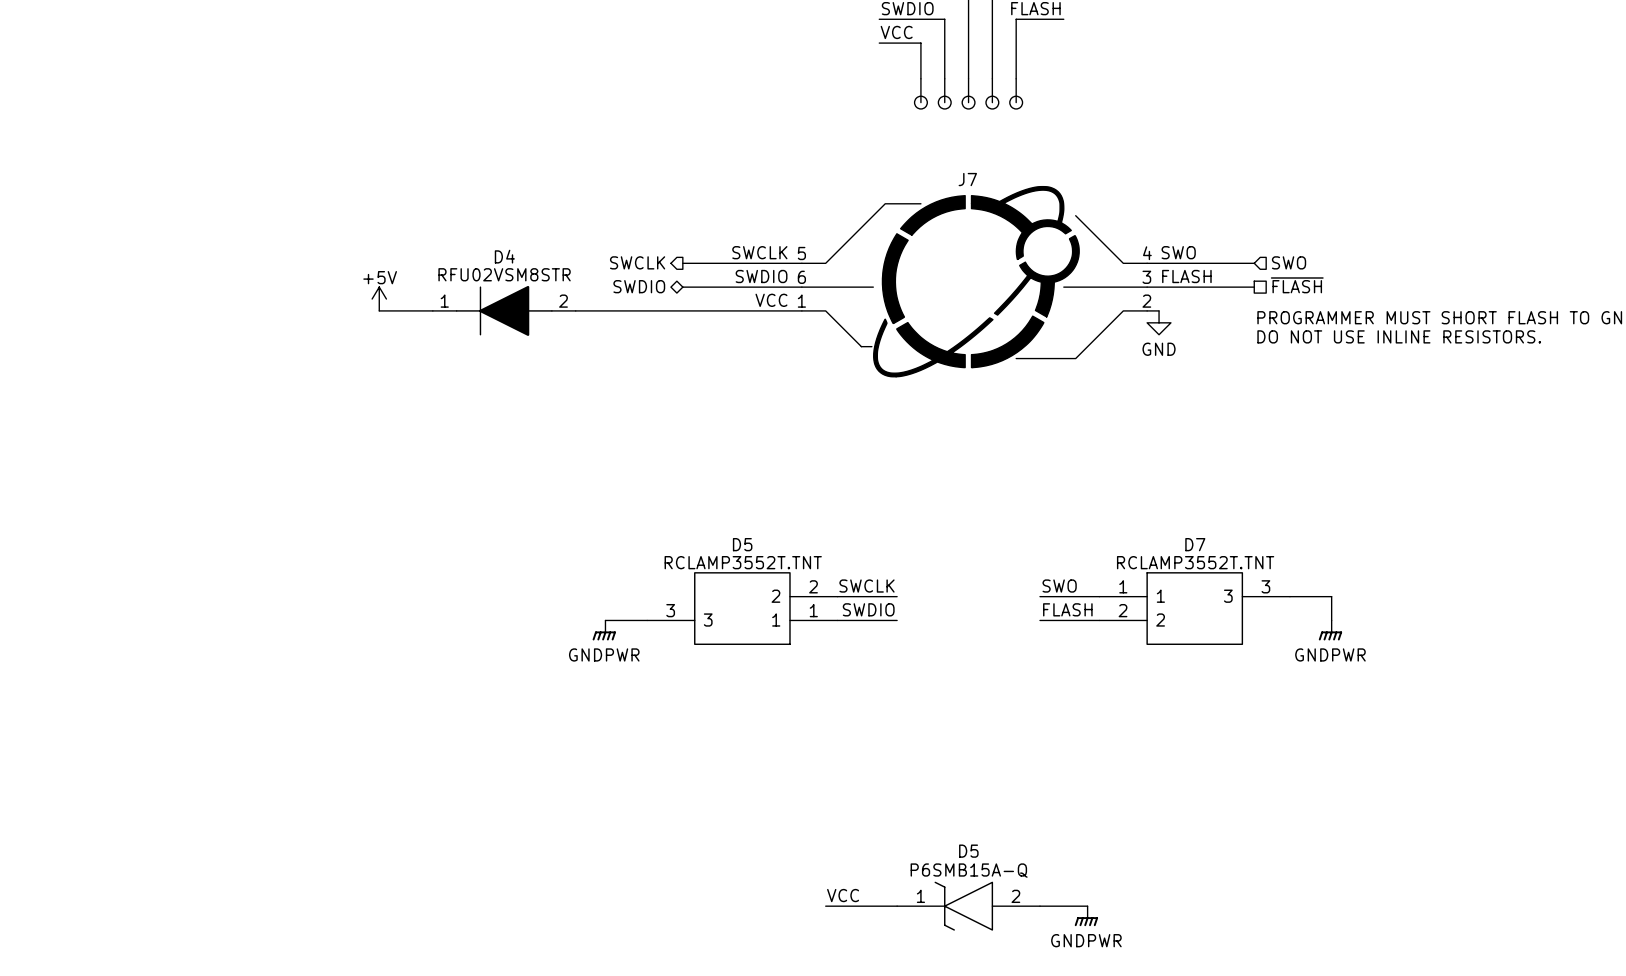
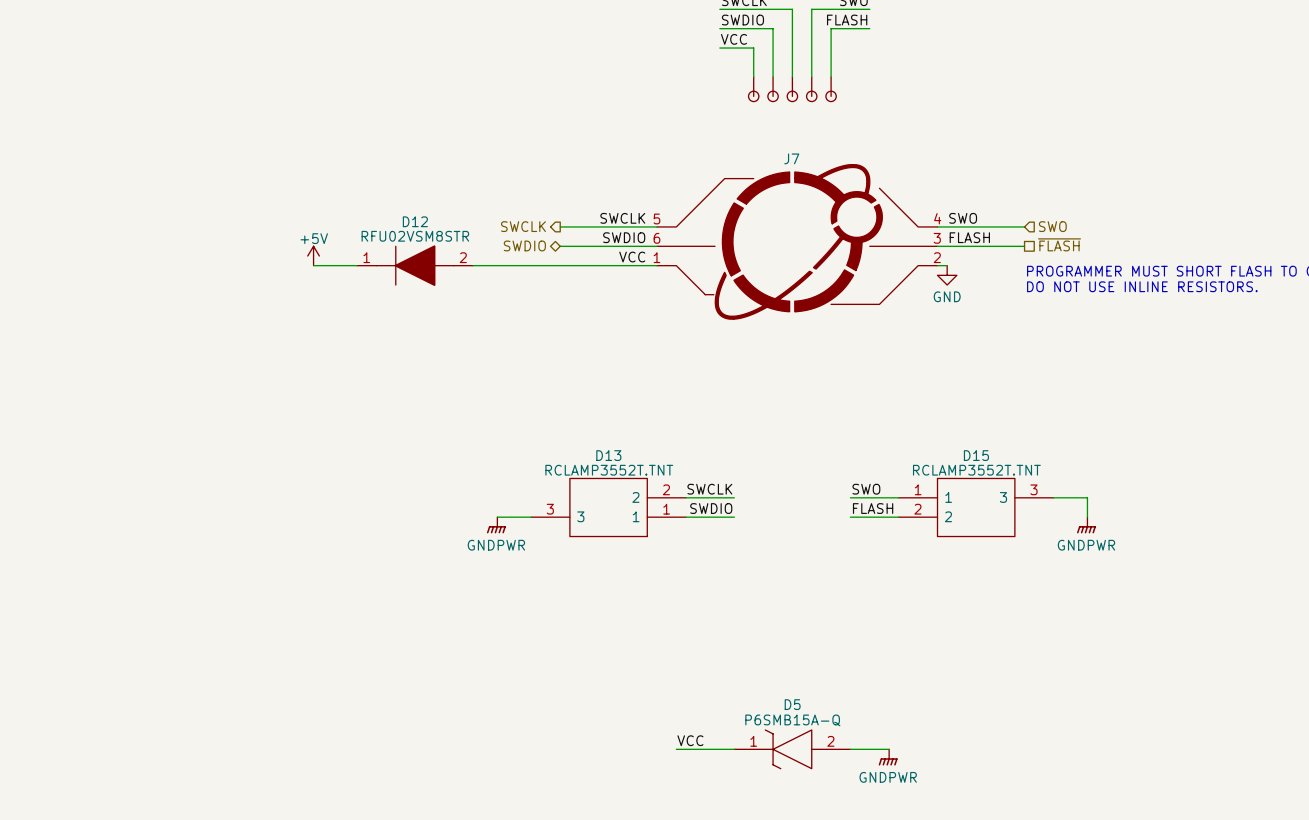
D4 name: D4 (504, 256) -> D12 (415, 221)
D5 name: D5 (742, 544) -> D13 (608, 455)
D7 name: D7 (1195, 544) -> D15 (976, 455)

